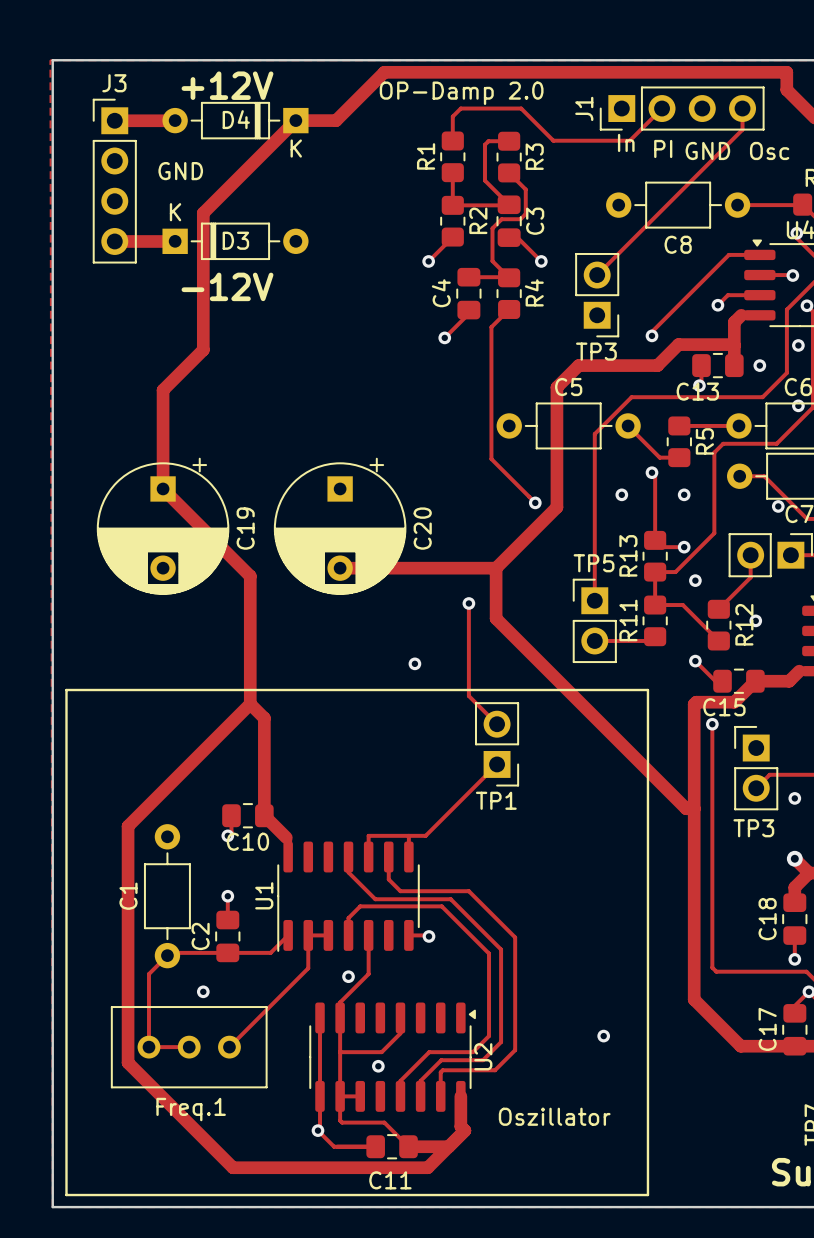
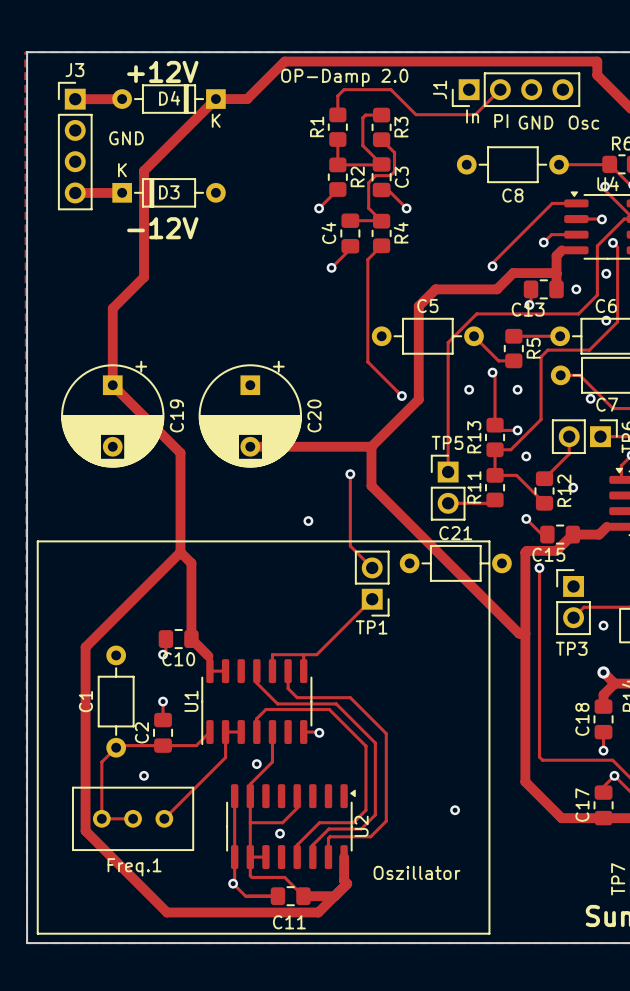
track: (742, 108) (742, 129) (597, 275) -> none
TP3: (597, 295) -> none
C21: none -> (455, 563)
track: none -> (209, 671) (225, 671)

